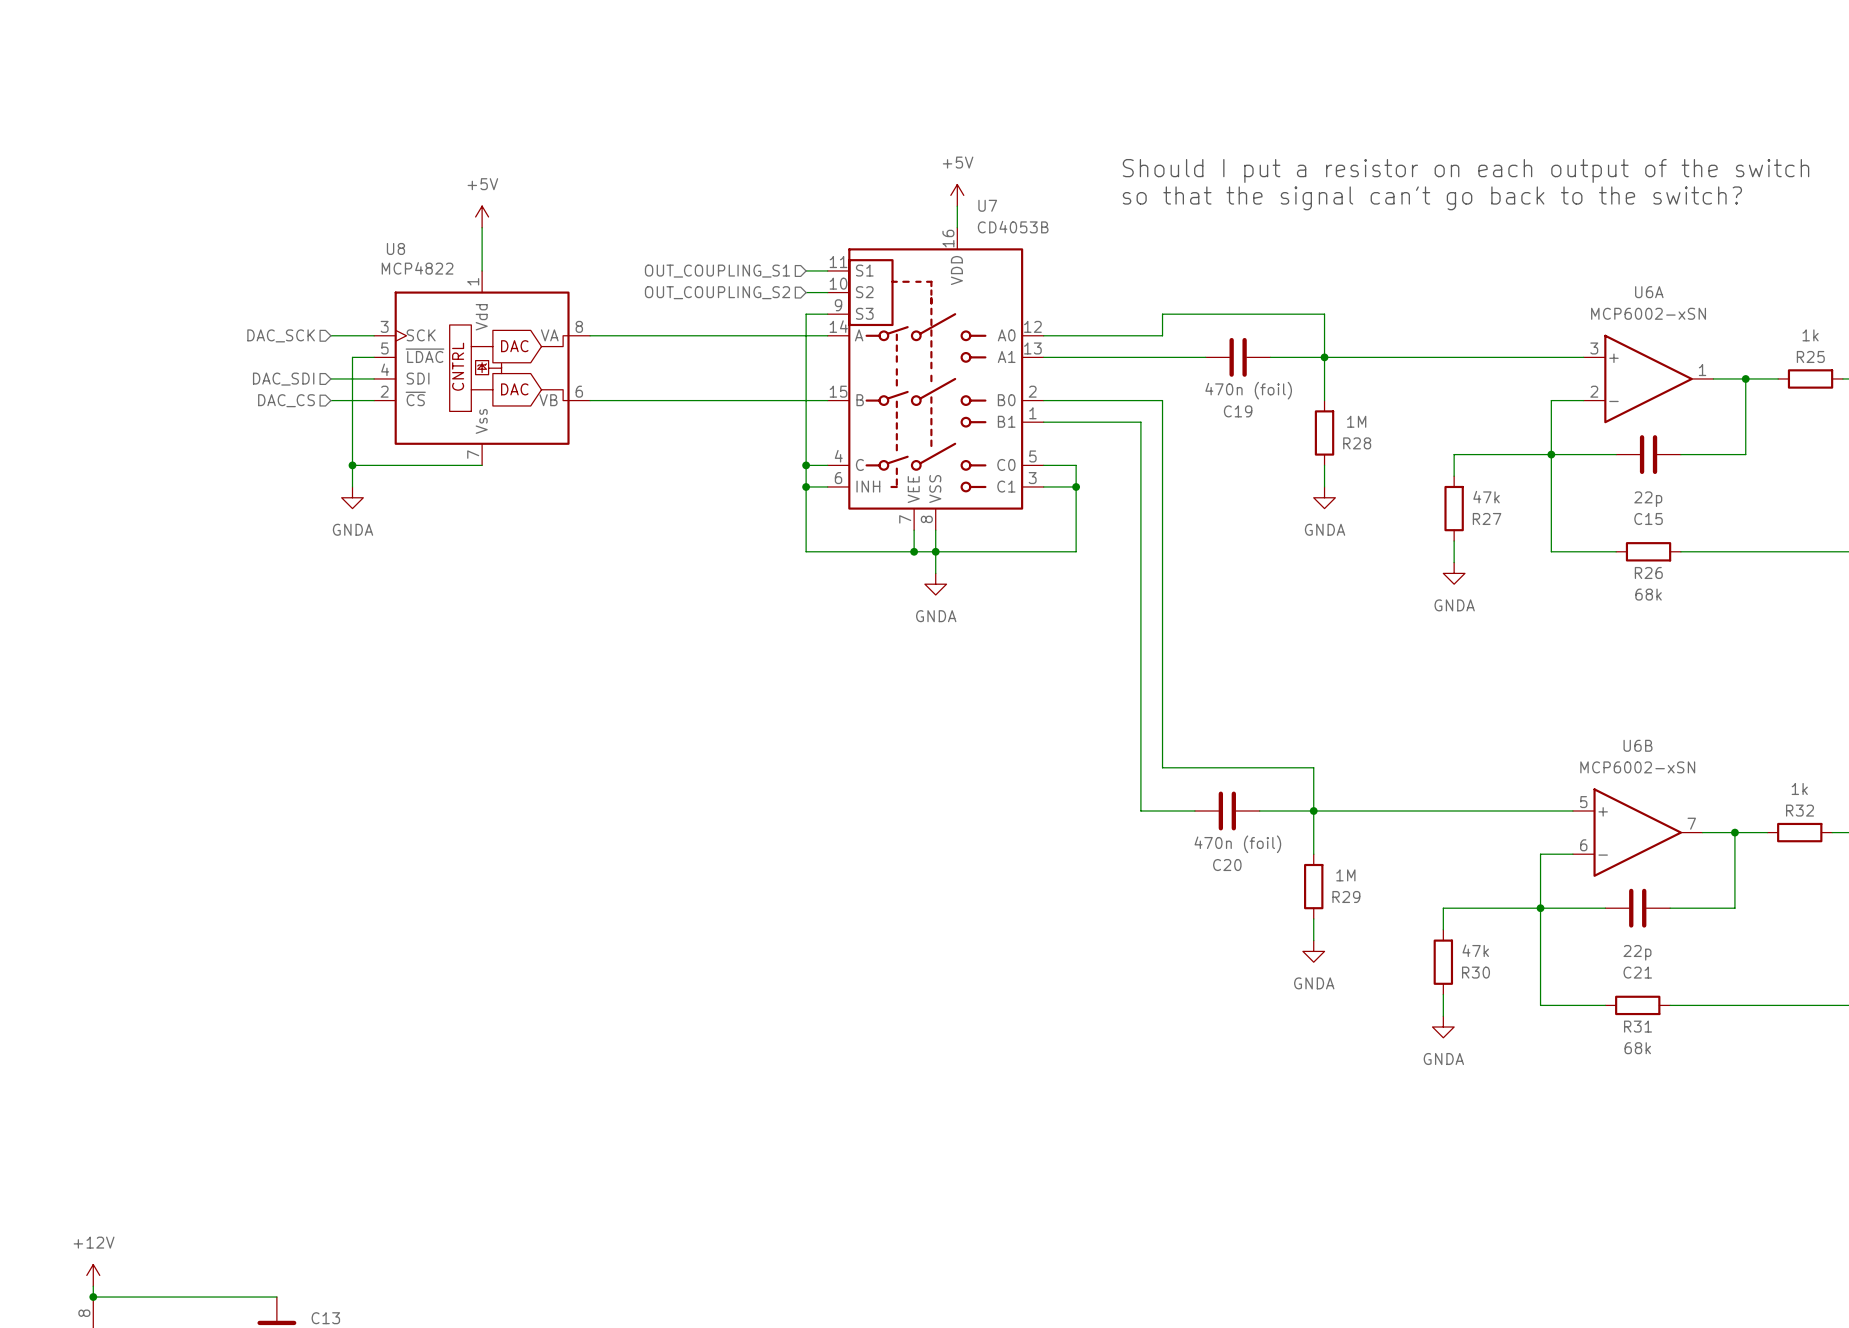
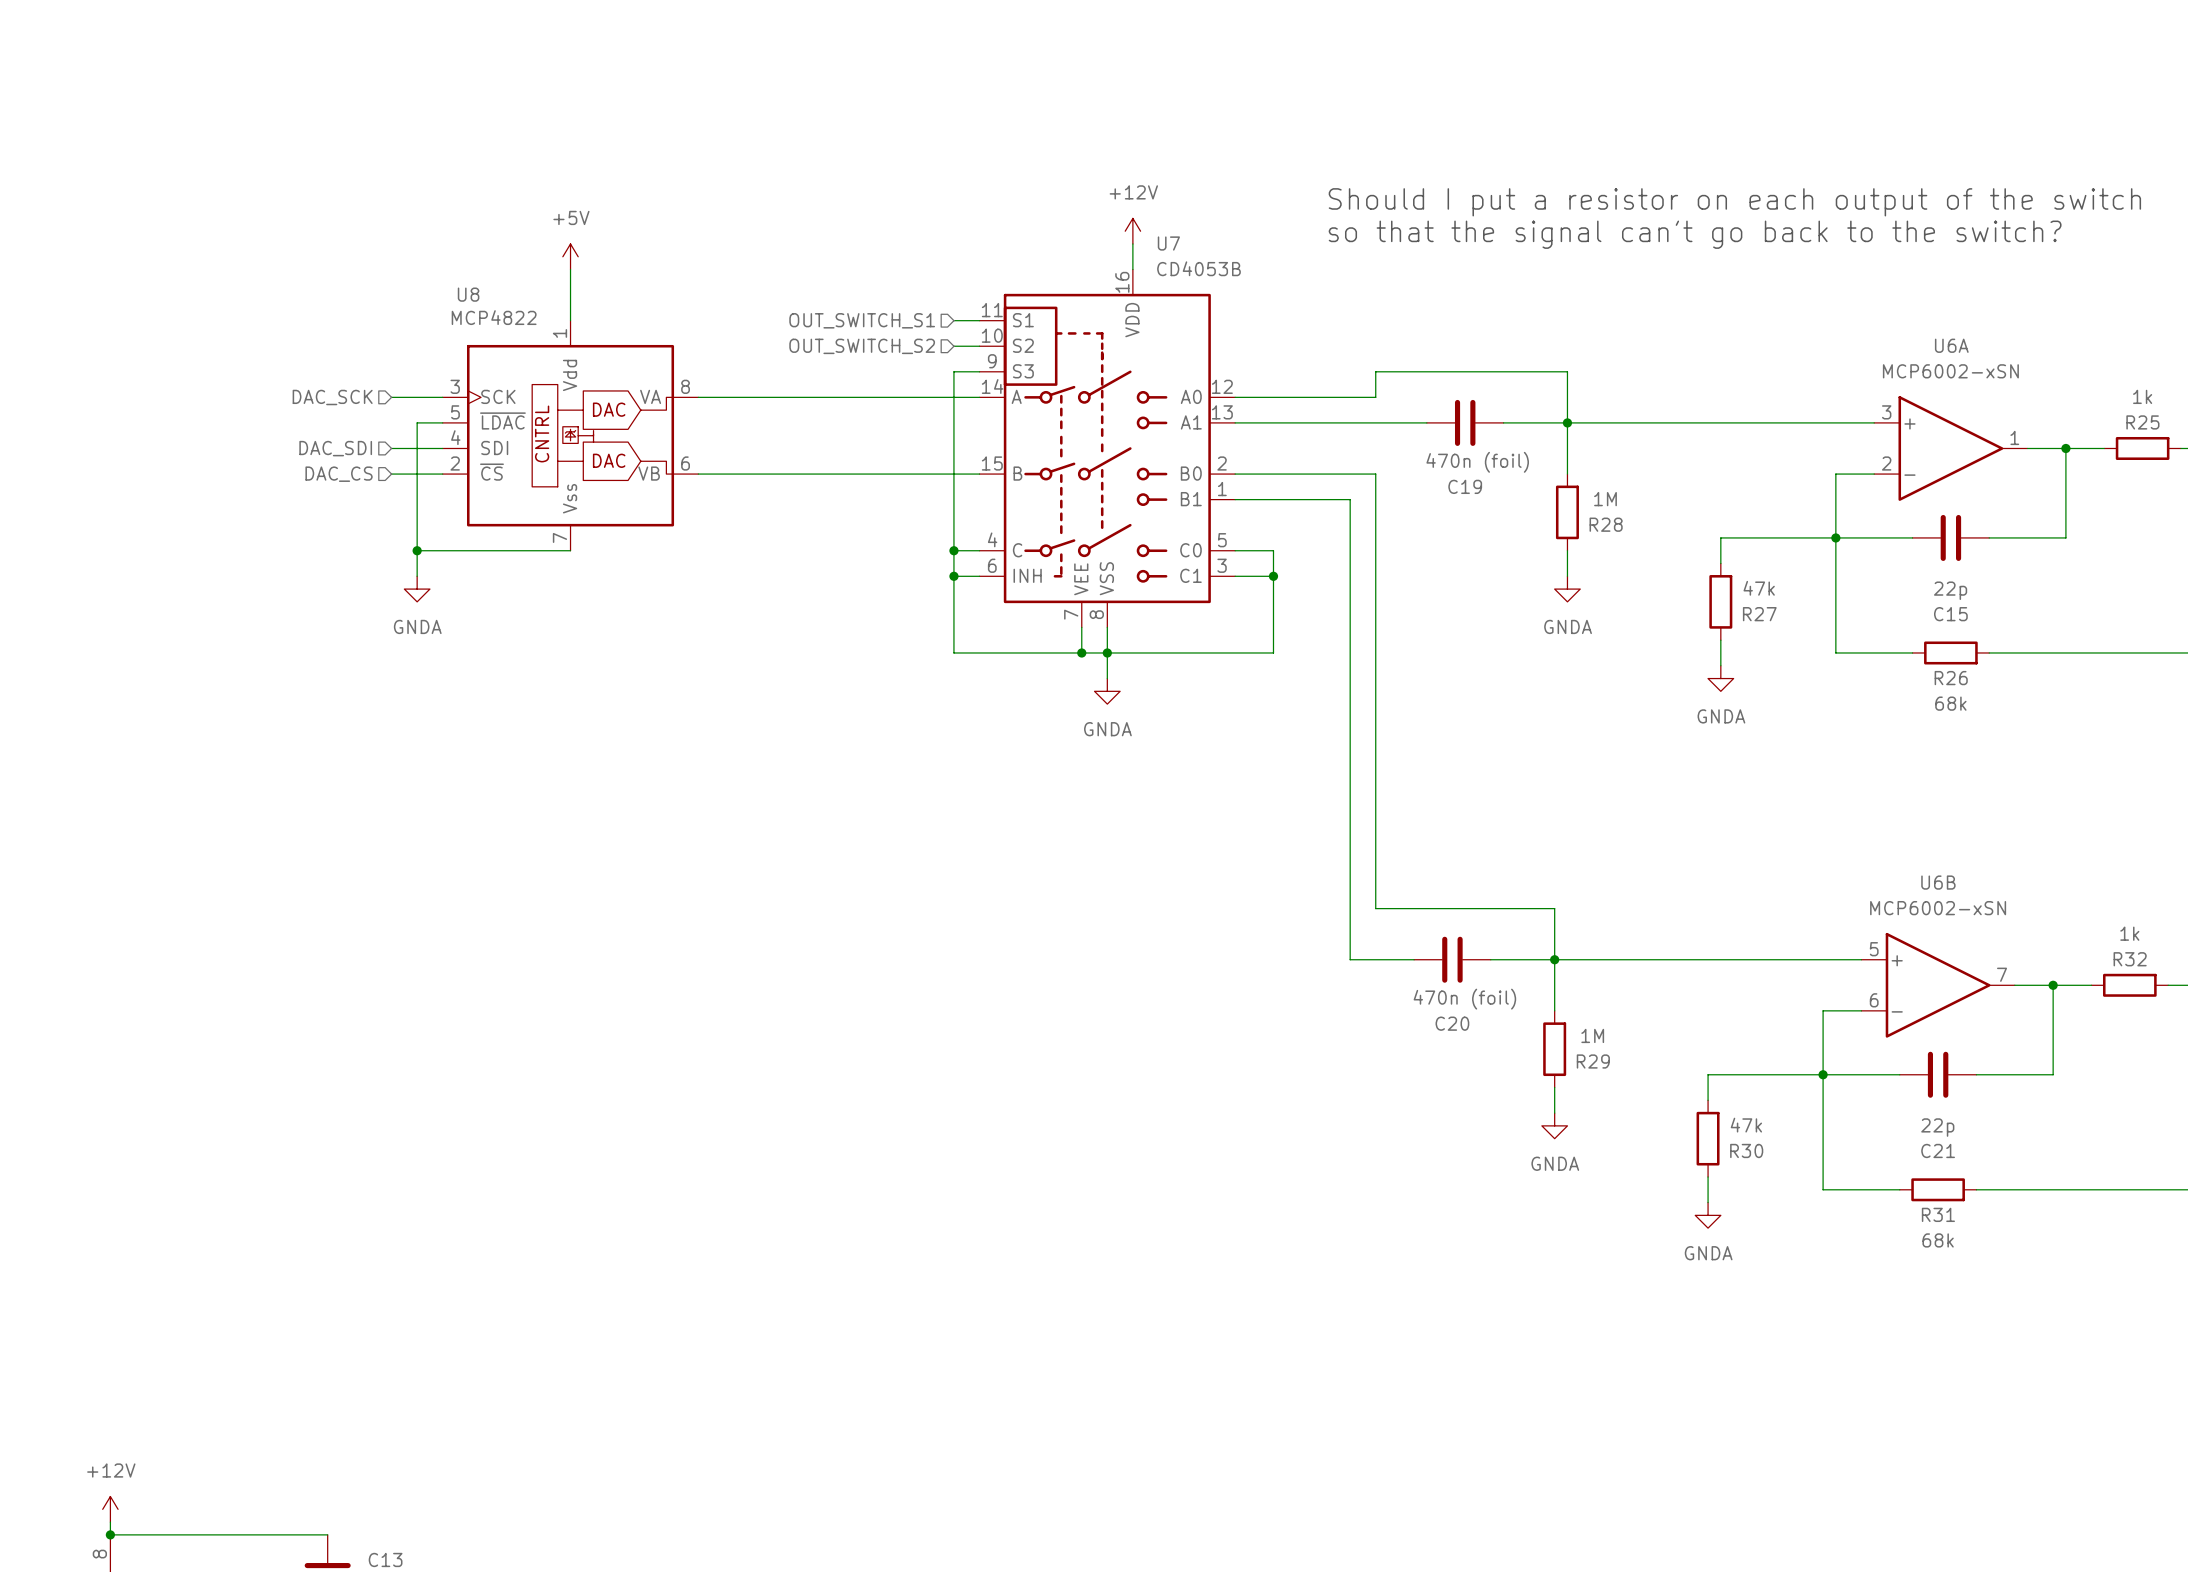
power symbol: +5V (957, 195) -> +12V (1132, 231)
hierarchical label: OUT_COUPLING_S1 (717, 271) -> OUT_SWITCH_S1 (862, 320)
hierarchical label: OUT_COUPLING_S2 (717, 292) -> OUT_SWITCH_S2 (862, 346)

